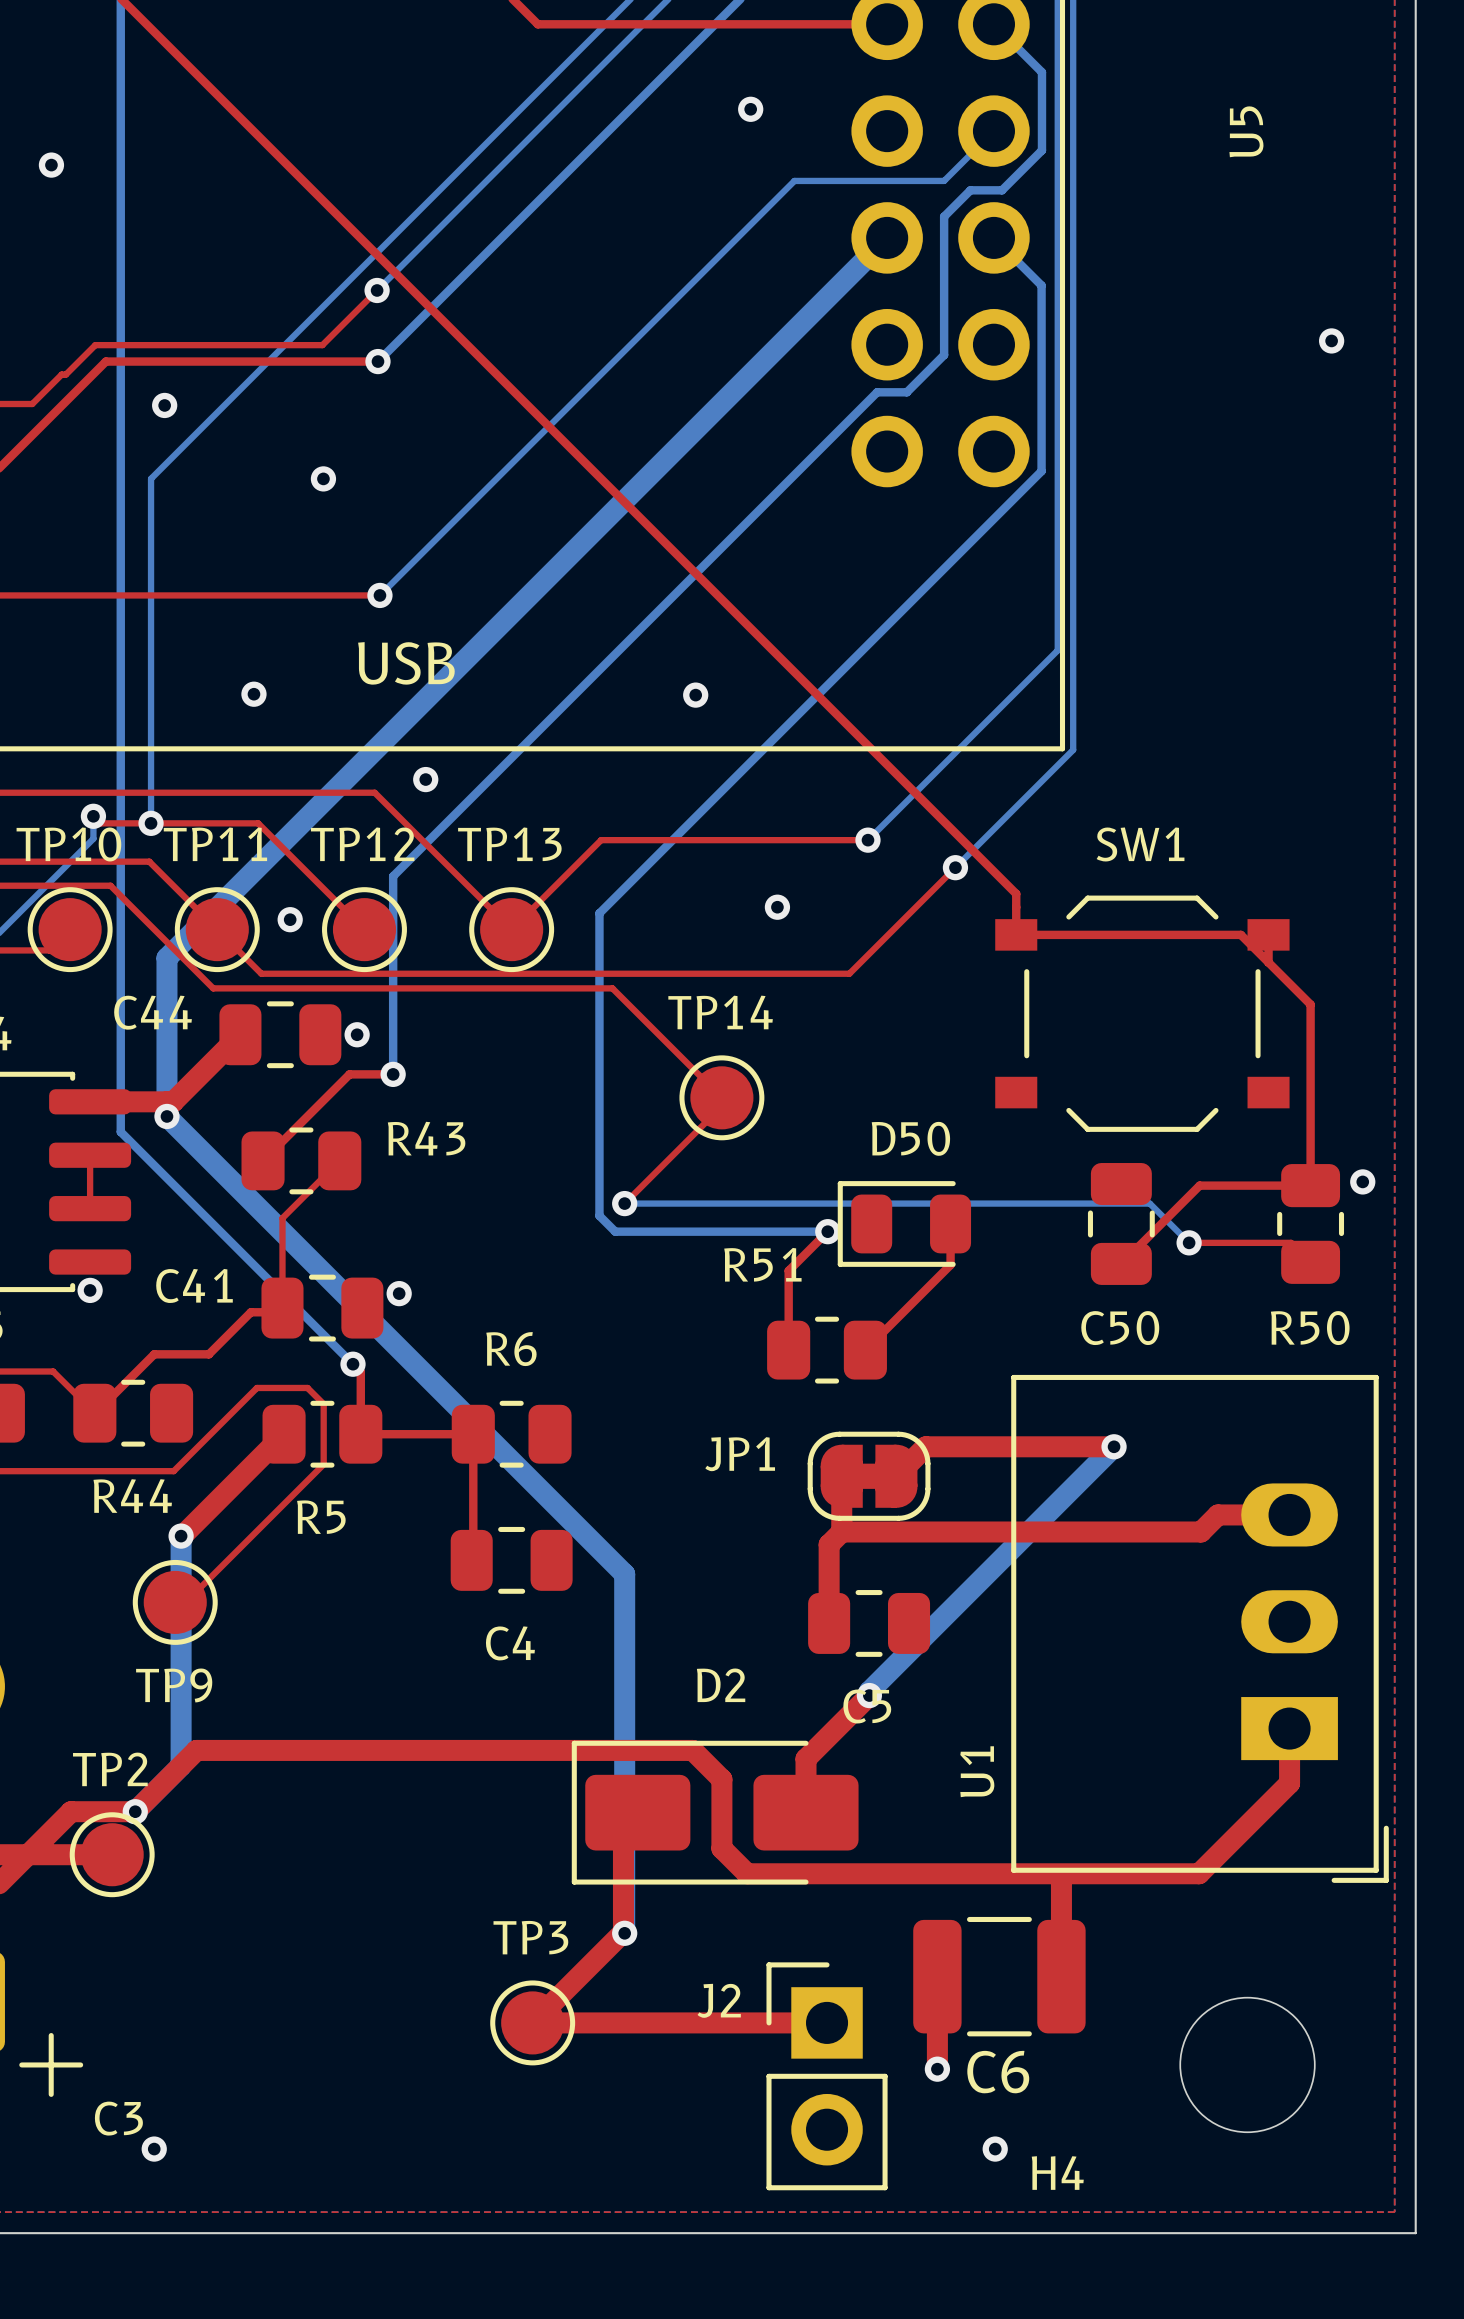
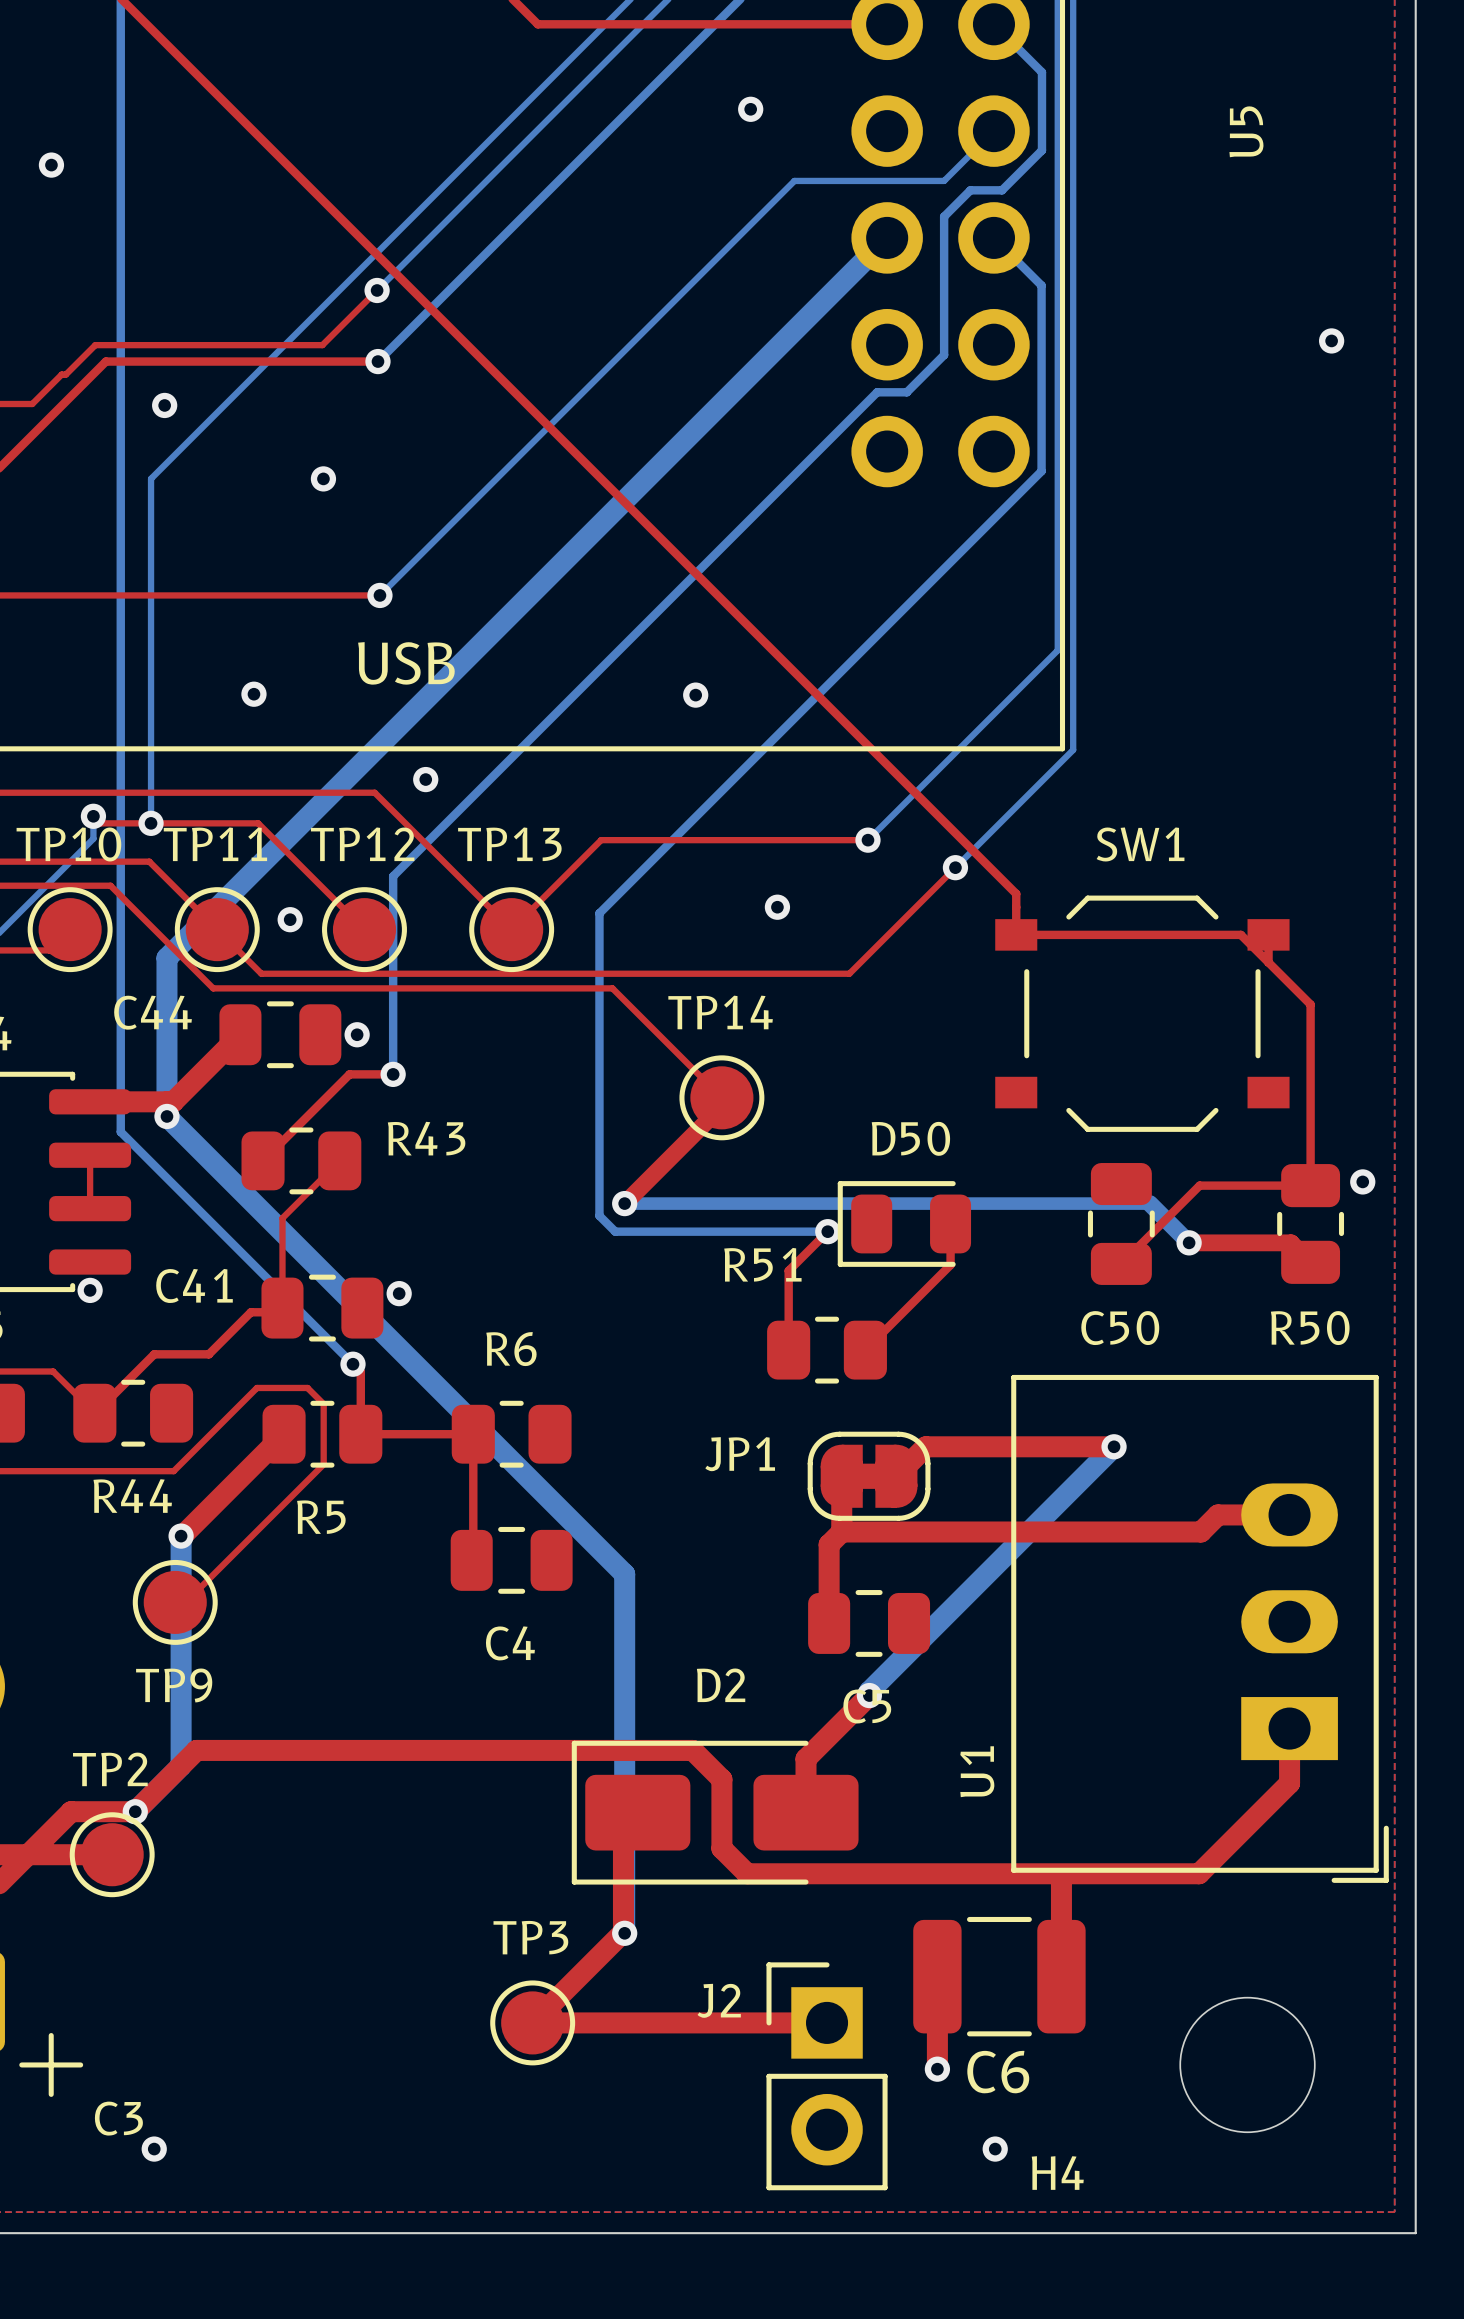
top track width: thin (721, 1097) (721, 1106) (624, 1203) -> thick (721, 1097) (721, 1106) (624, 1203)
bottom track width: thin (624, 1203) (1149, 1203) (1189, 1242) -> thick (624, 1203) (1149, 1203) (1189, 1242)
top track width: thin (1189, 1242) (1291, 1242) (1310, 1262) -> thick (1189, 1242) (1291, 1242) (1310, 1262)

